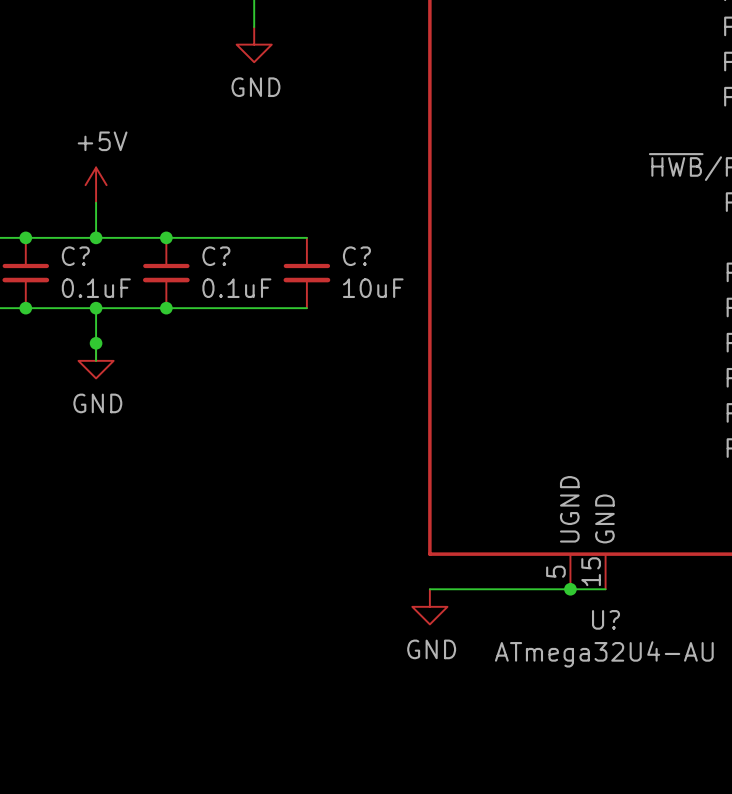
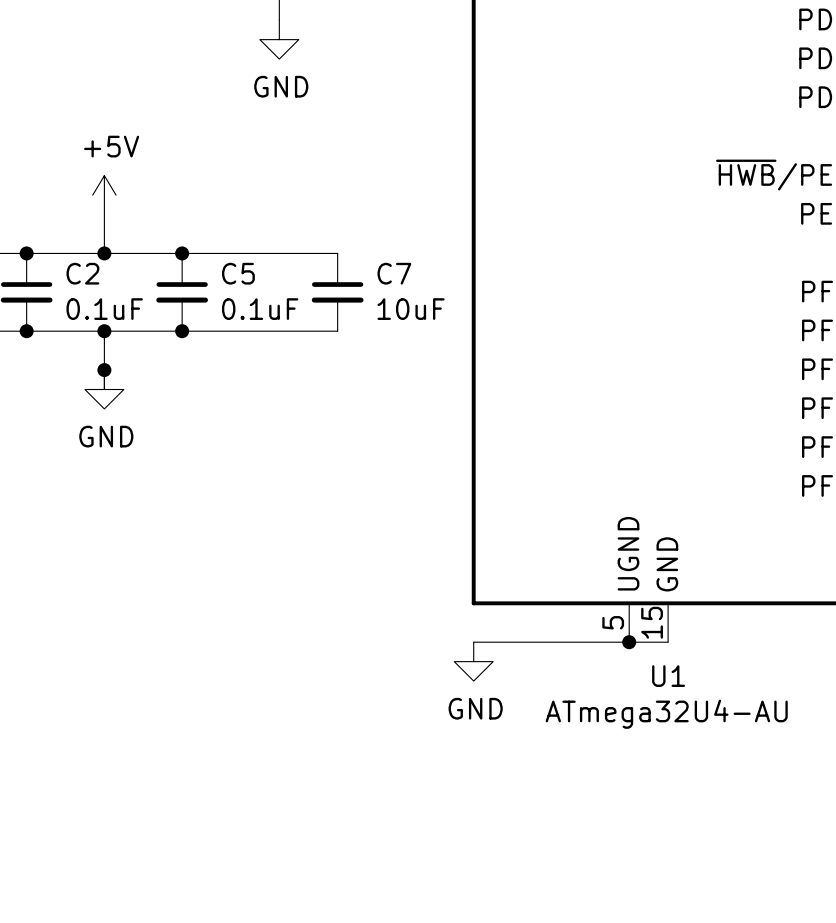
C? name: C? (75, 256) -> C2 (82, 273)
C? name: C? (216, 256) -> C5 (238, 273)
C? name: C? (356, 256) -> C7 (394, 273)
U? name: U? (606, 619) -> U1 (668, 676)

